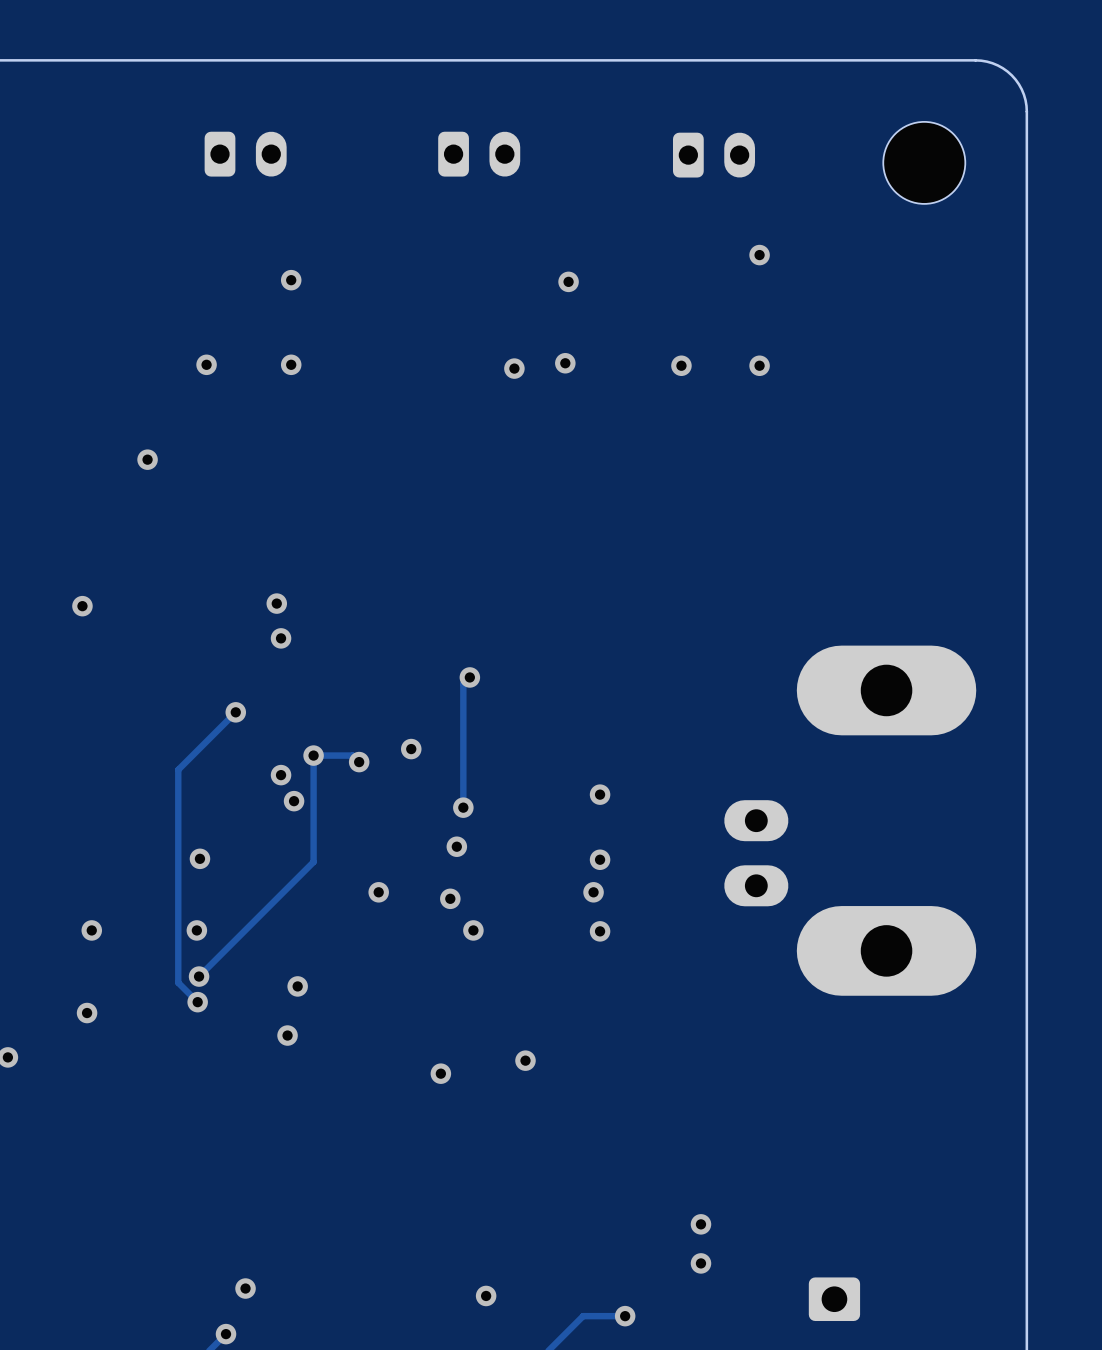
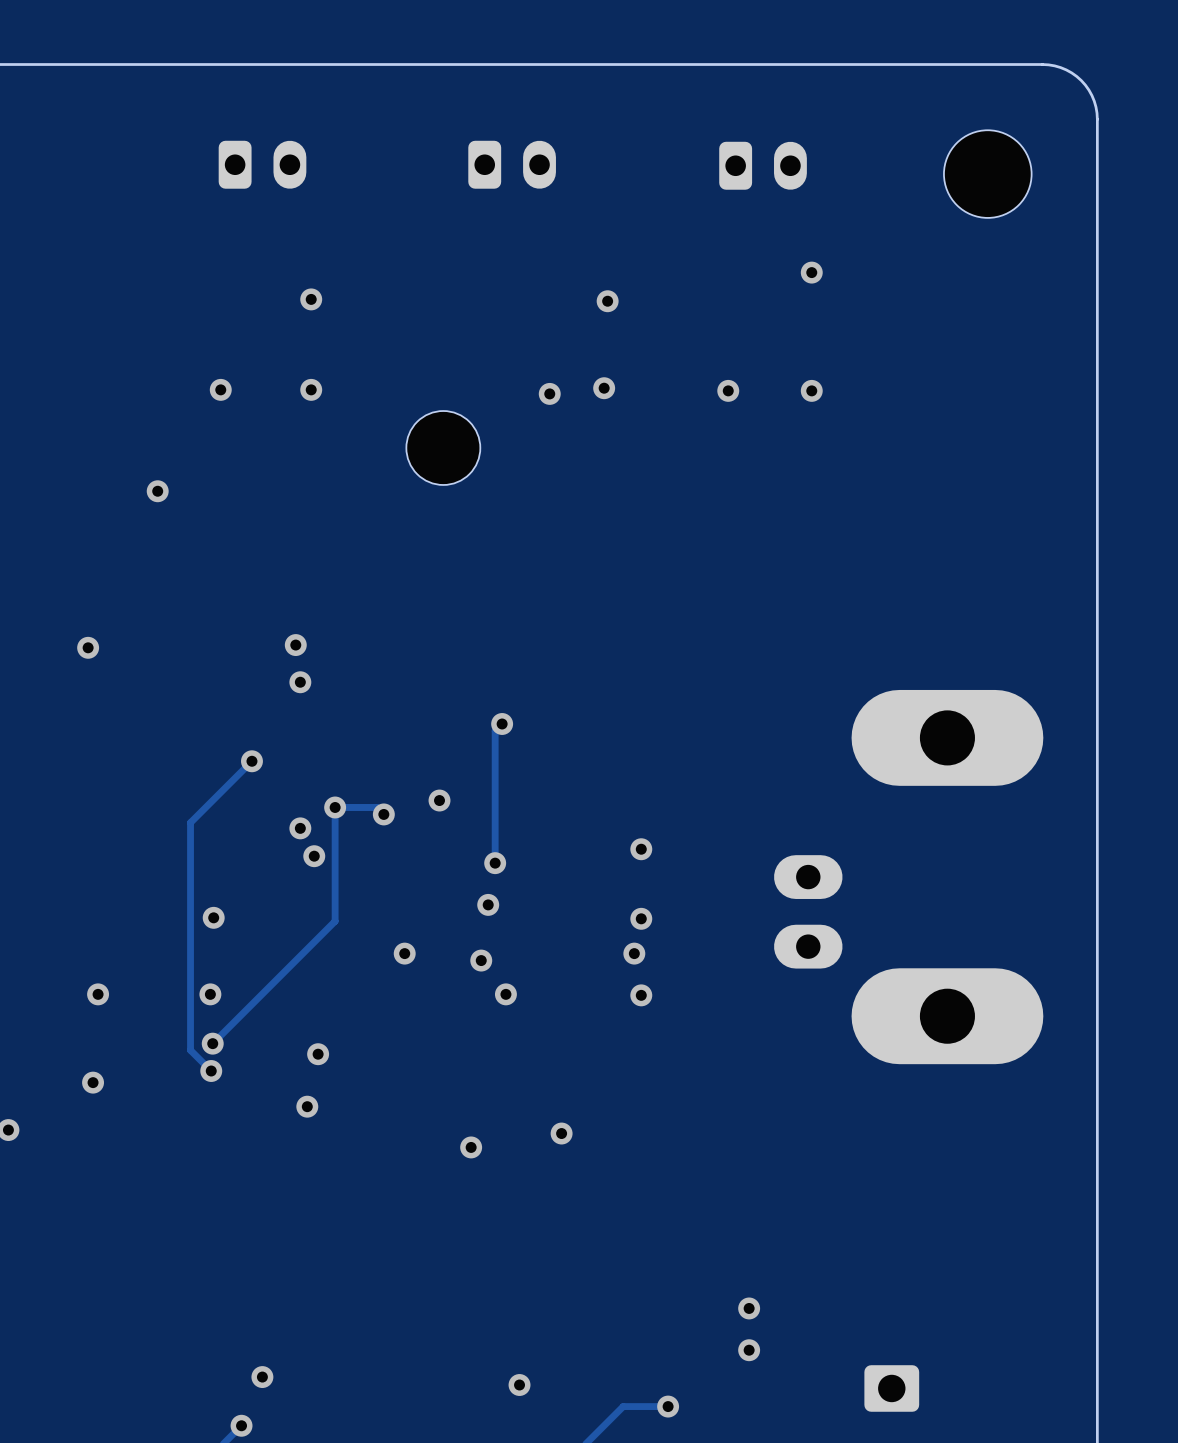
part: none -> (443, 447)

